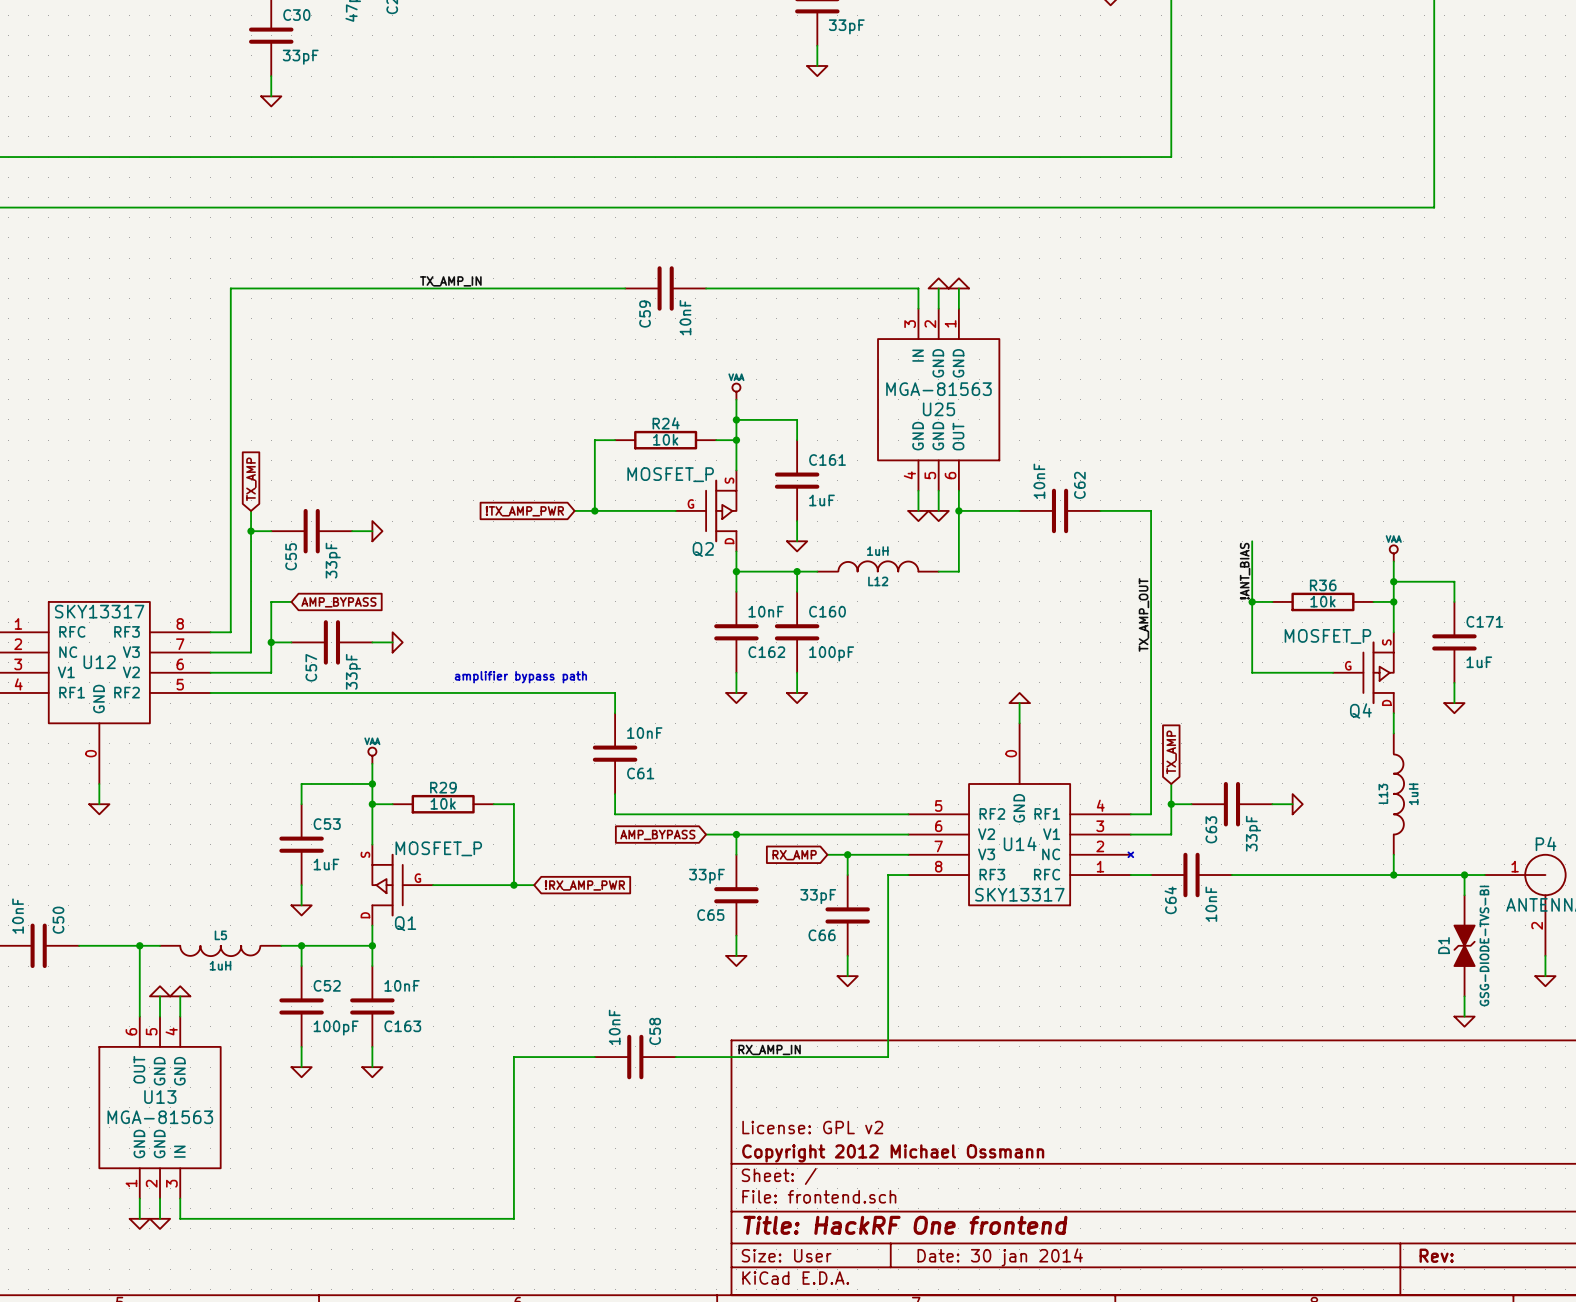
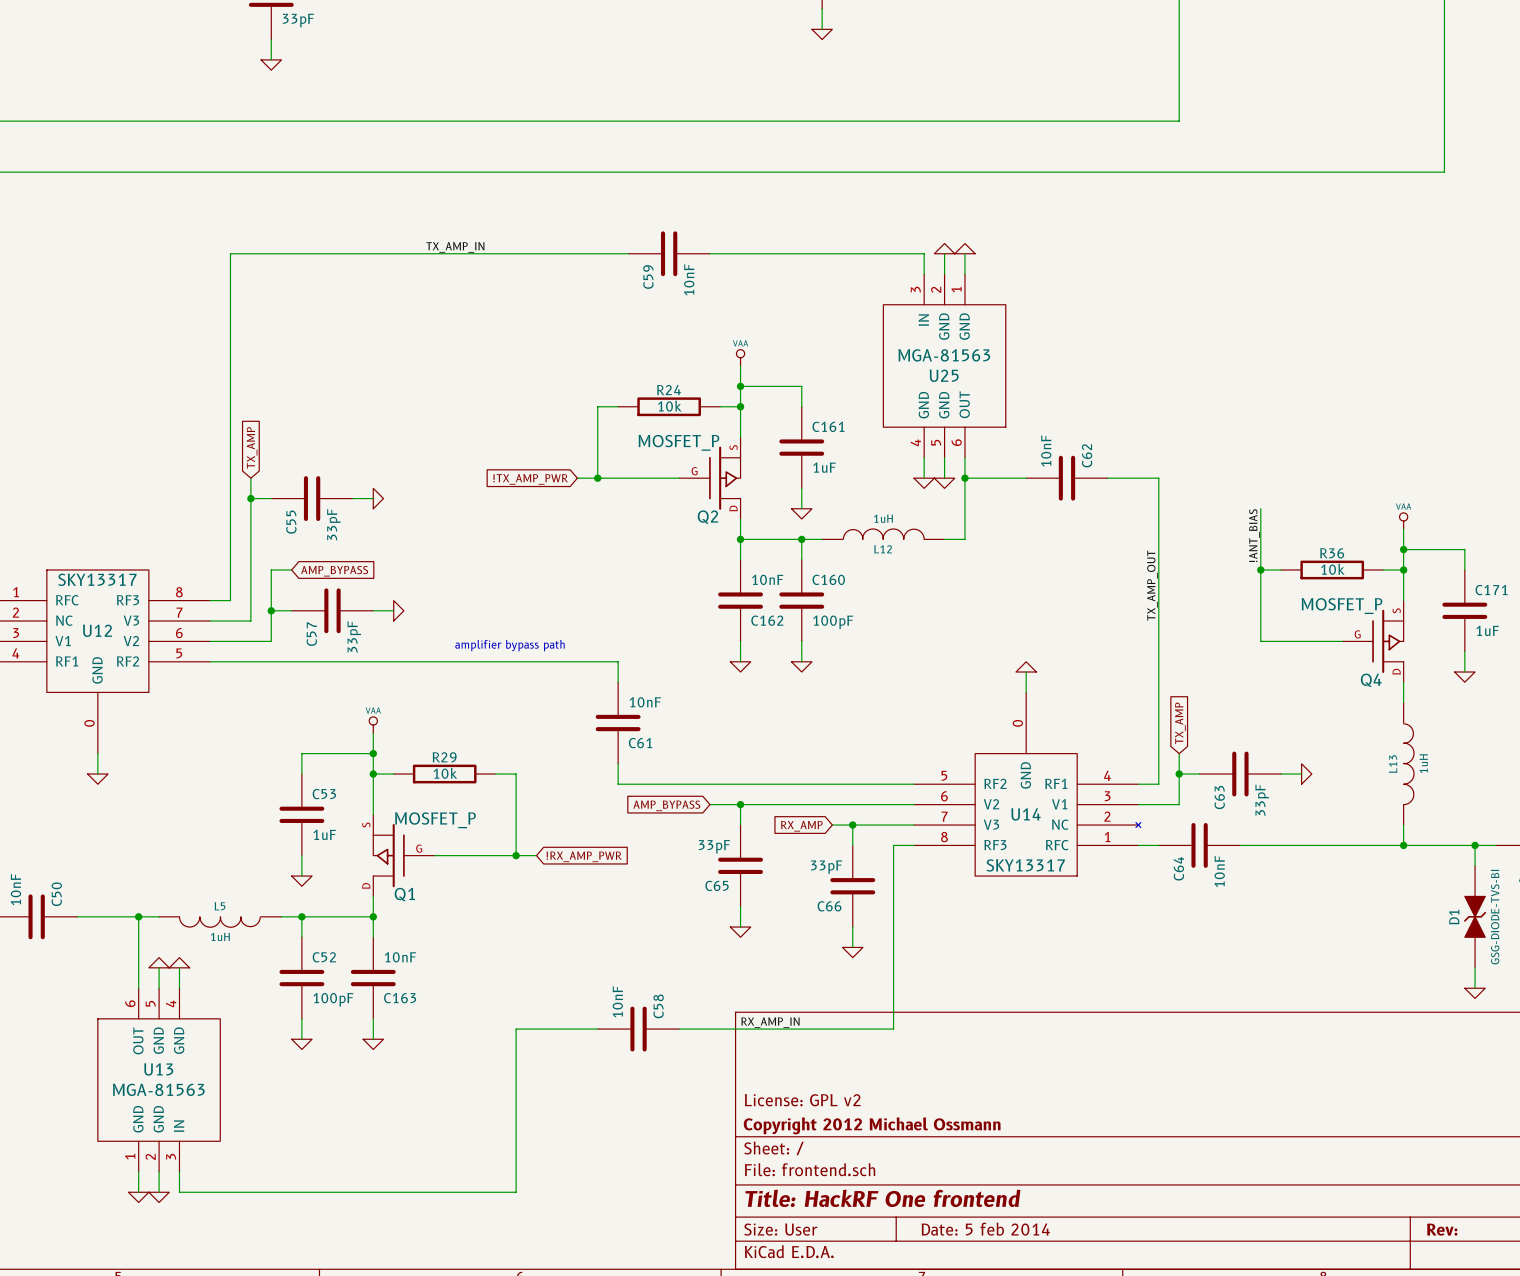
title block: Date: 30 jan 2014 (1000, 1257) -> Date: 5 feb 2014 (985, 1229)

